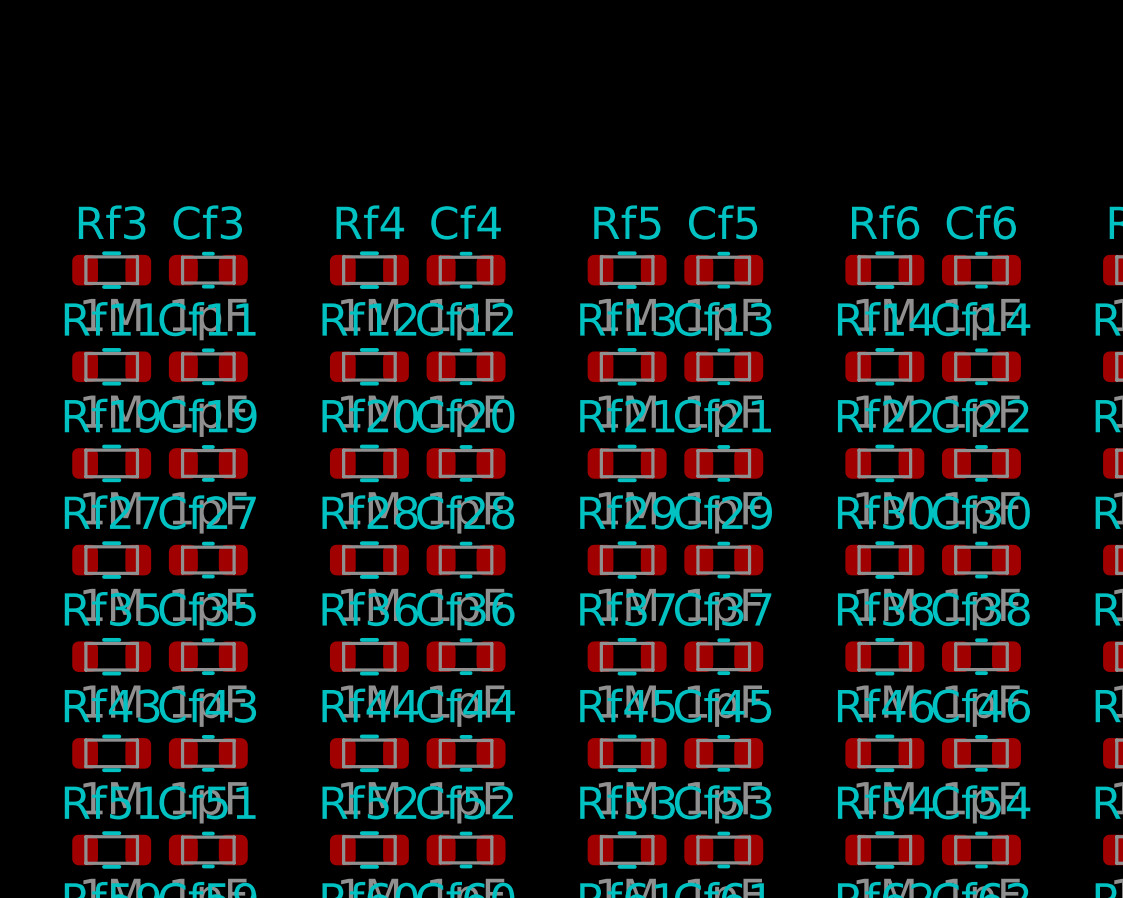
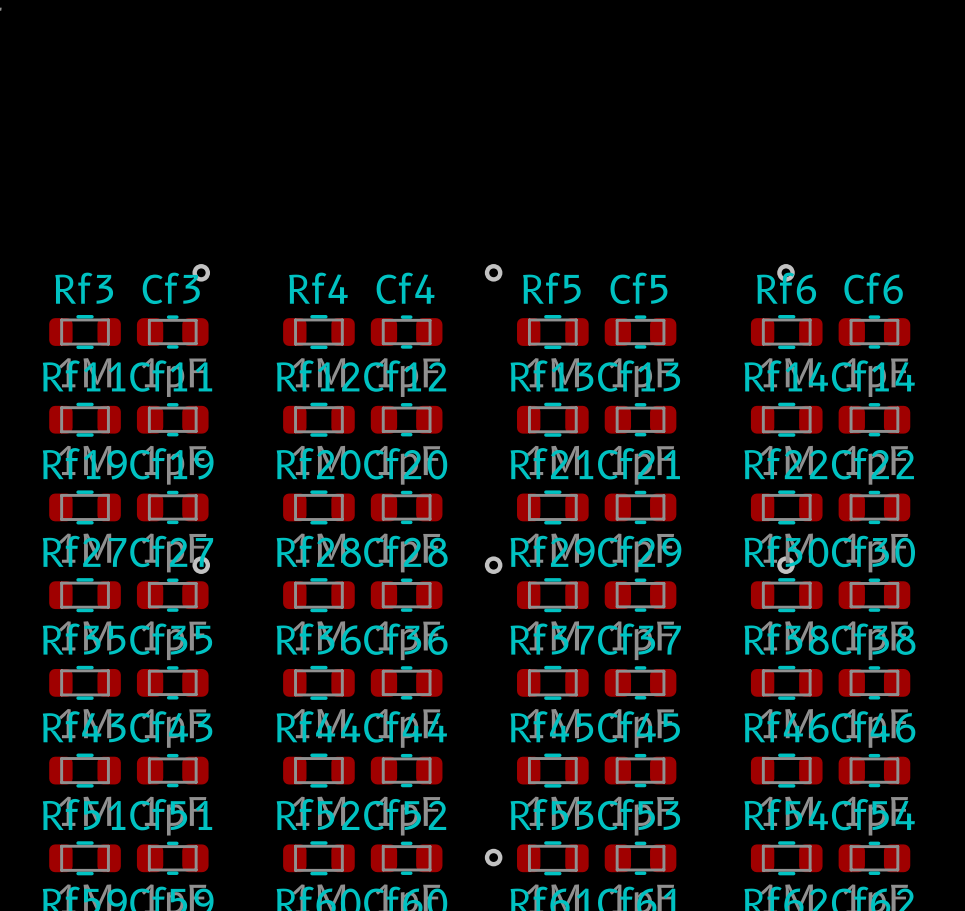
via: none -> (201, 272)
via: none -> (493, 272)
via: none -> (785, 272)
via: none -> (201, 565)
via: none -> (493, 565)
via: none -> (785, 565)
via: none -> (493, 857)

